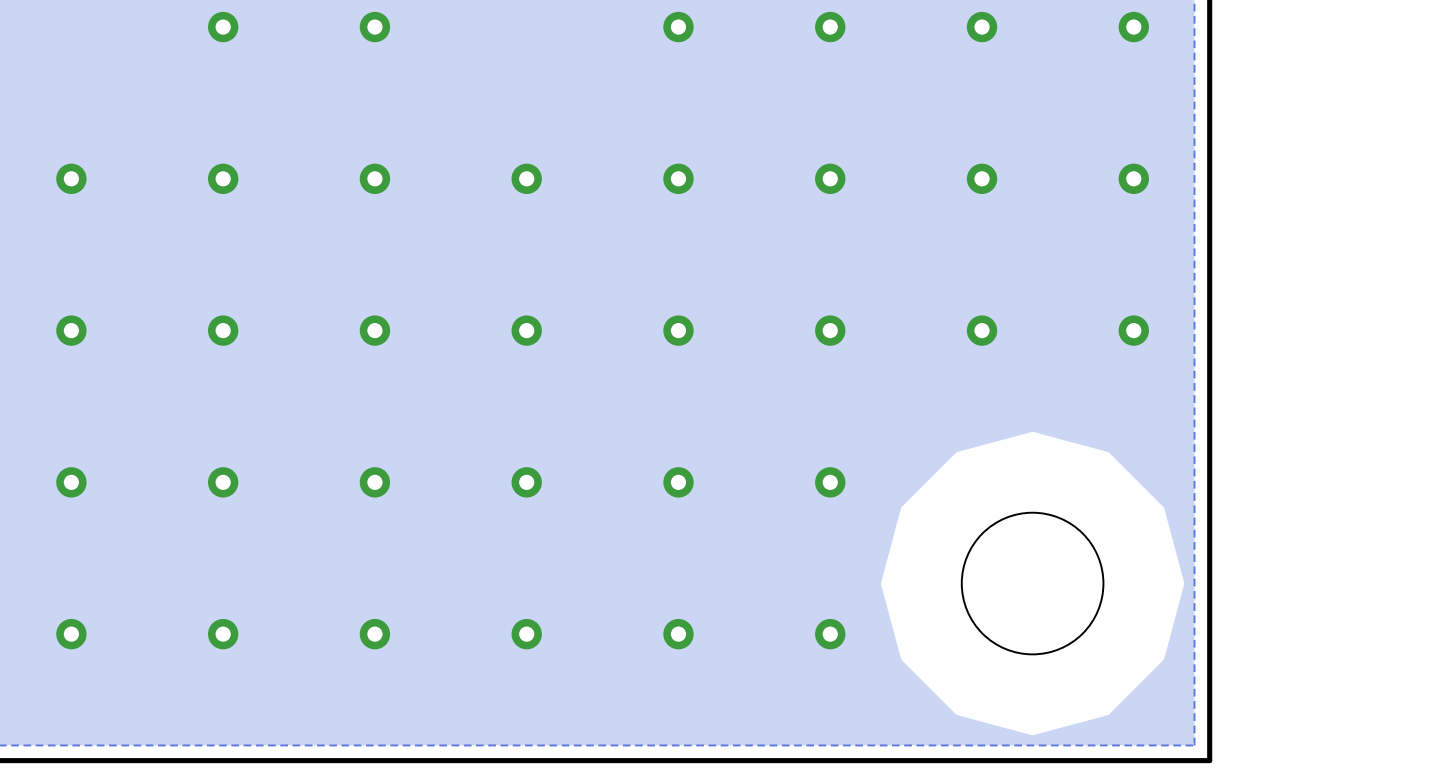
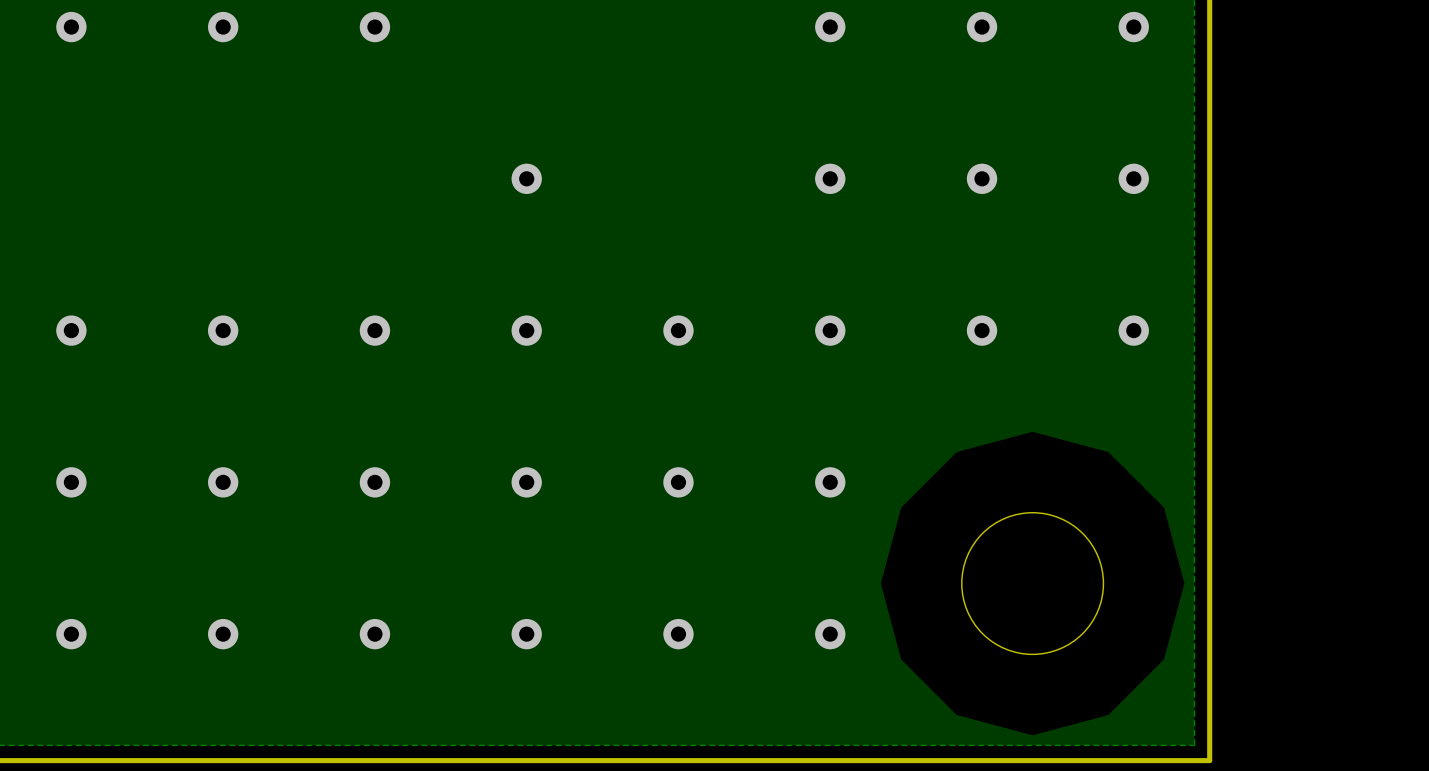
via: none -> (71, 27)
via: (678, 27) -> none
via: (71, 178) -> none
via: (223, 178) -> none
via: (374, 178) -> none
via: (678, 178) -> none

